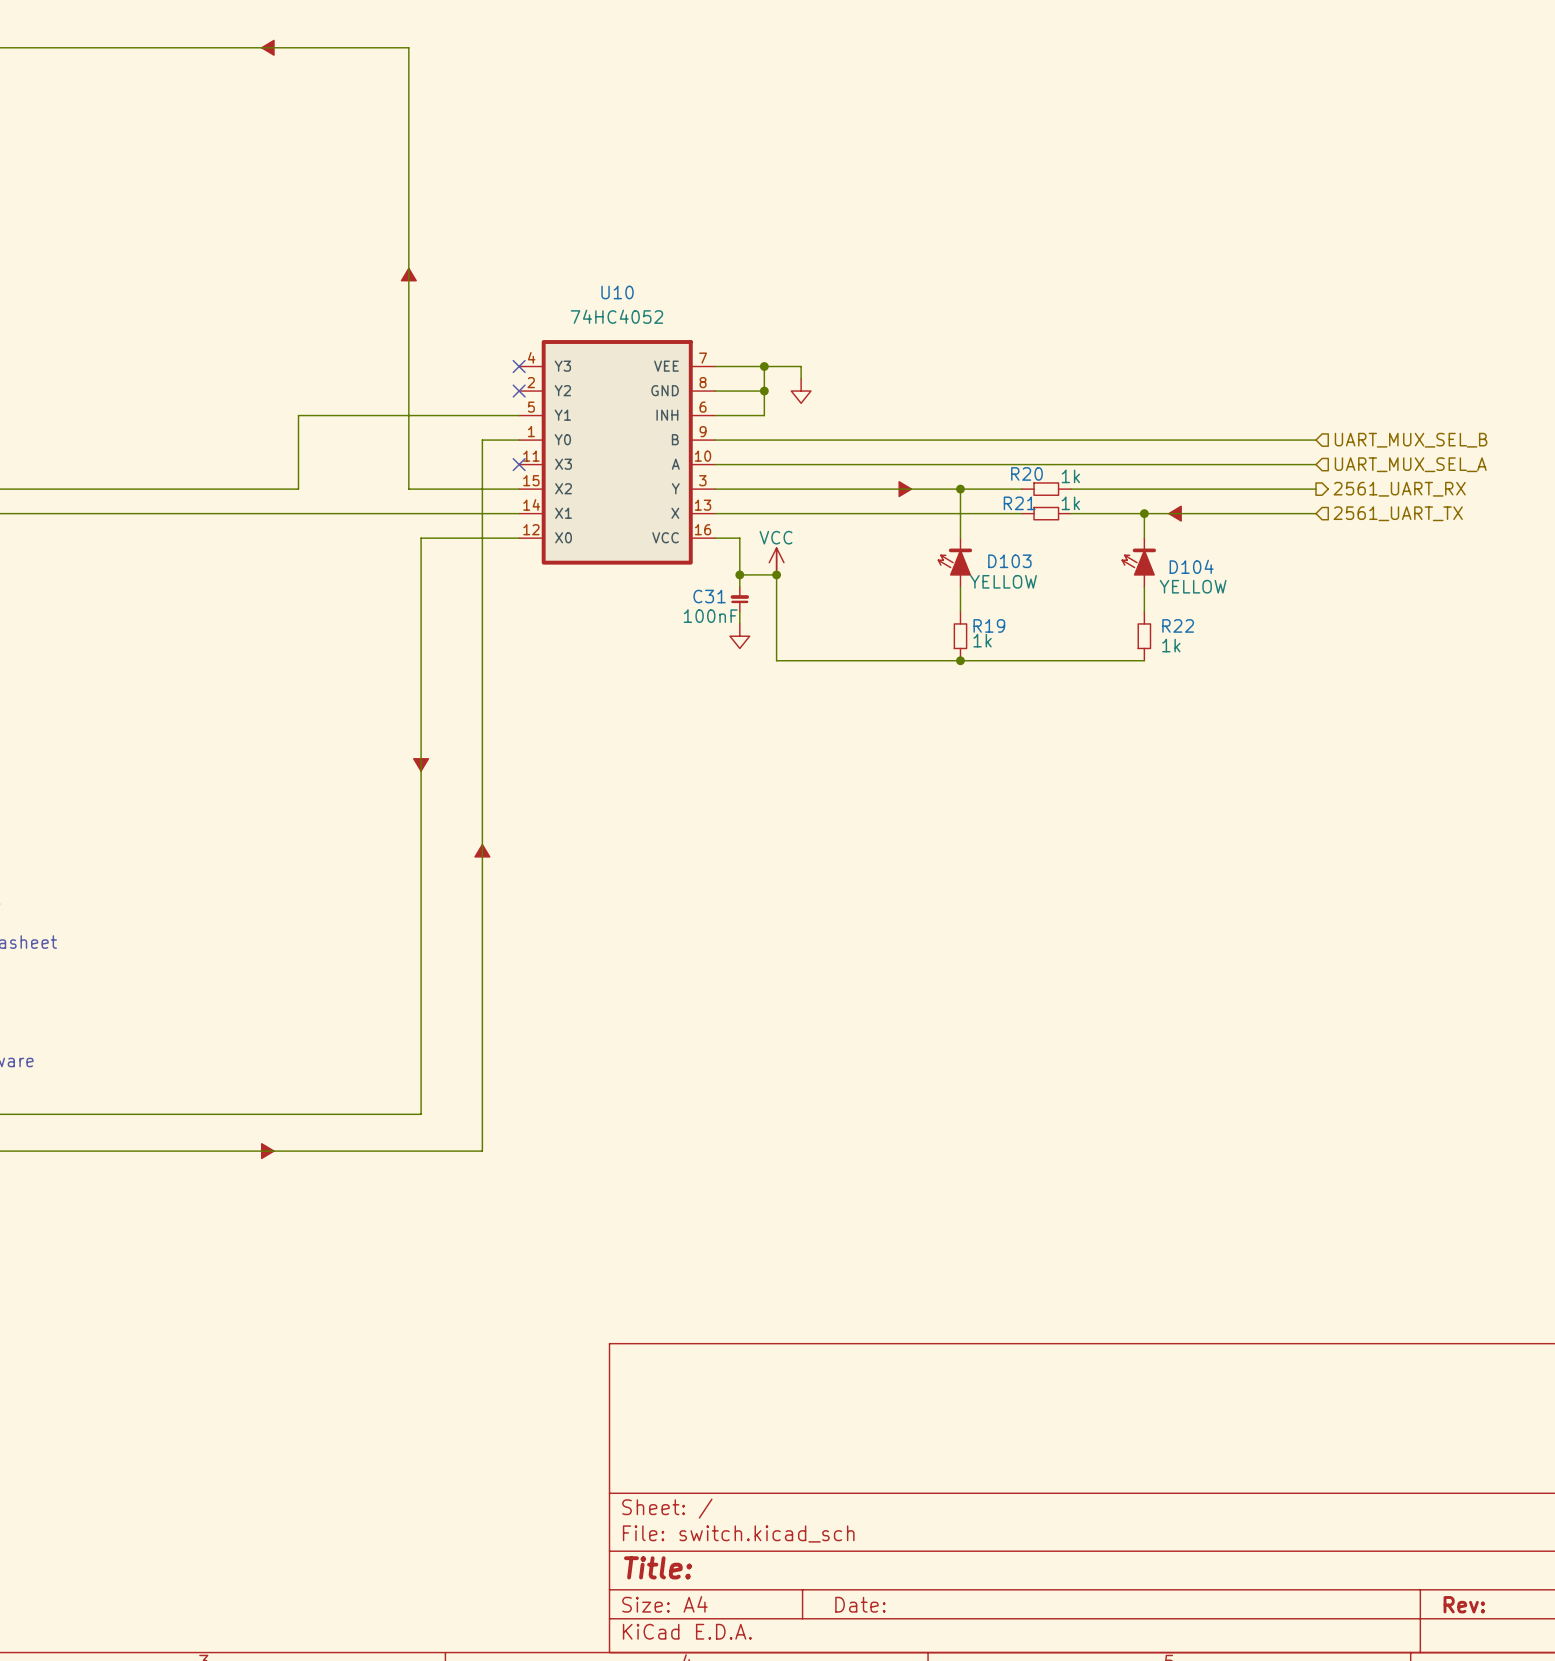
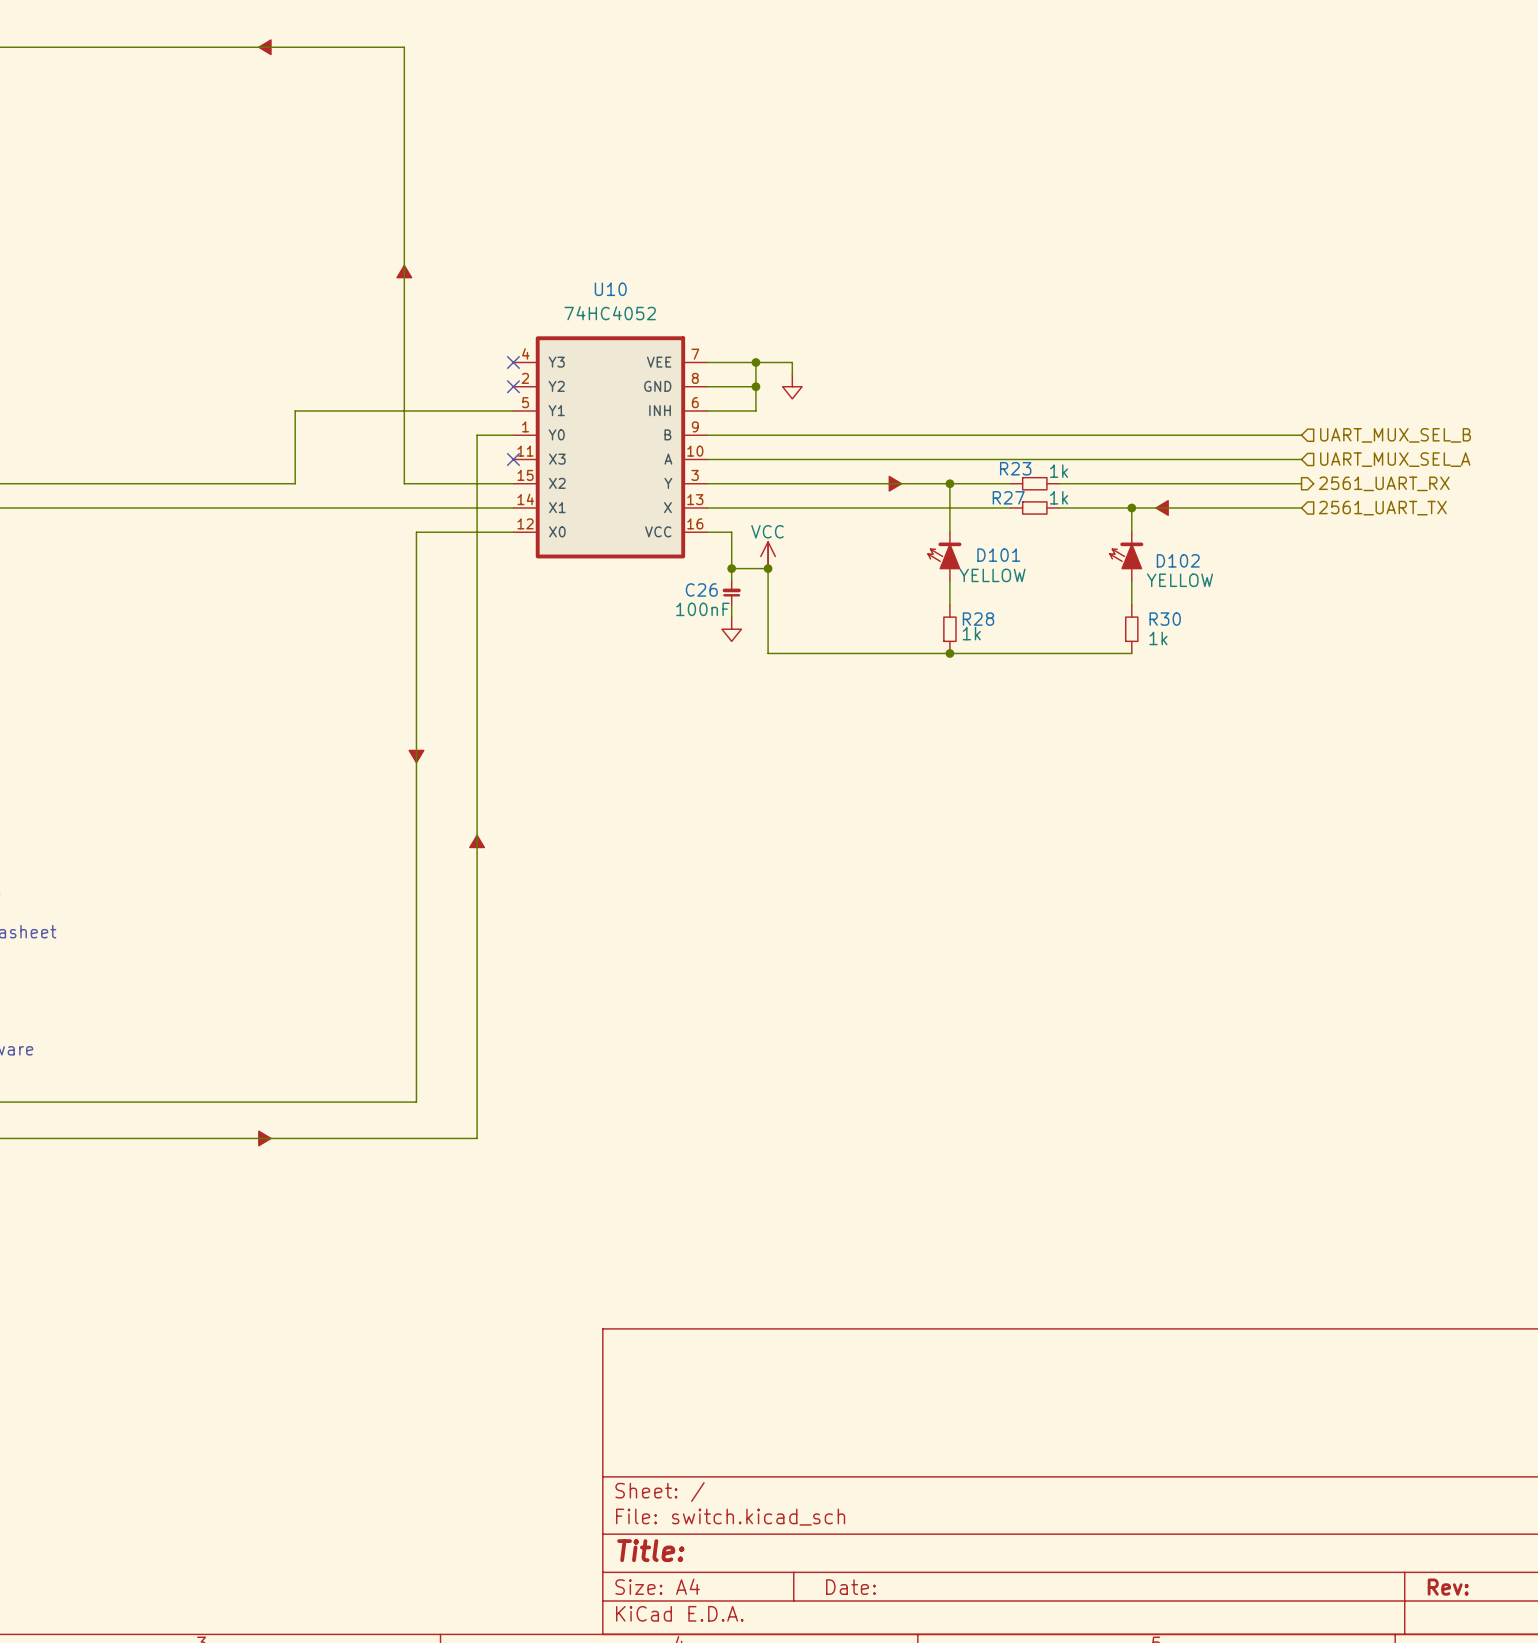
R20 name: R20 (1026, 473) -> R23 (1015, 468)
R21 name: R21 (1019, 503) -> R27 (1008, 497)
D103 name: D103 (1009, 561) -> D101 (998, 555)
D104 name: D104 (1191, 566) -> D102 (1178, 560)
C31 name: C31 (709, 596) -> C26 (701, 589)
R19 name: R19 (989, 625) -> R28 (978, 619)
R22 name: R22 (1178, 625) -> R30 (1165, 619)

